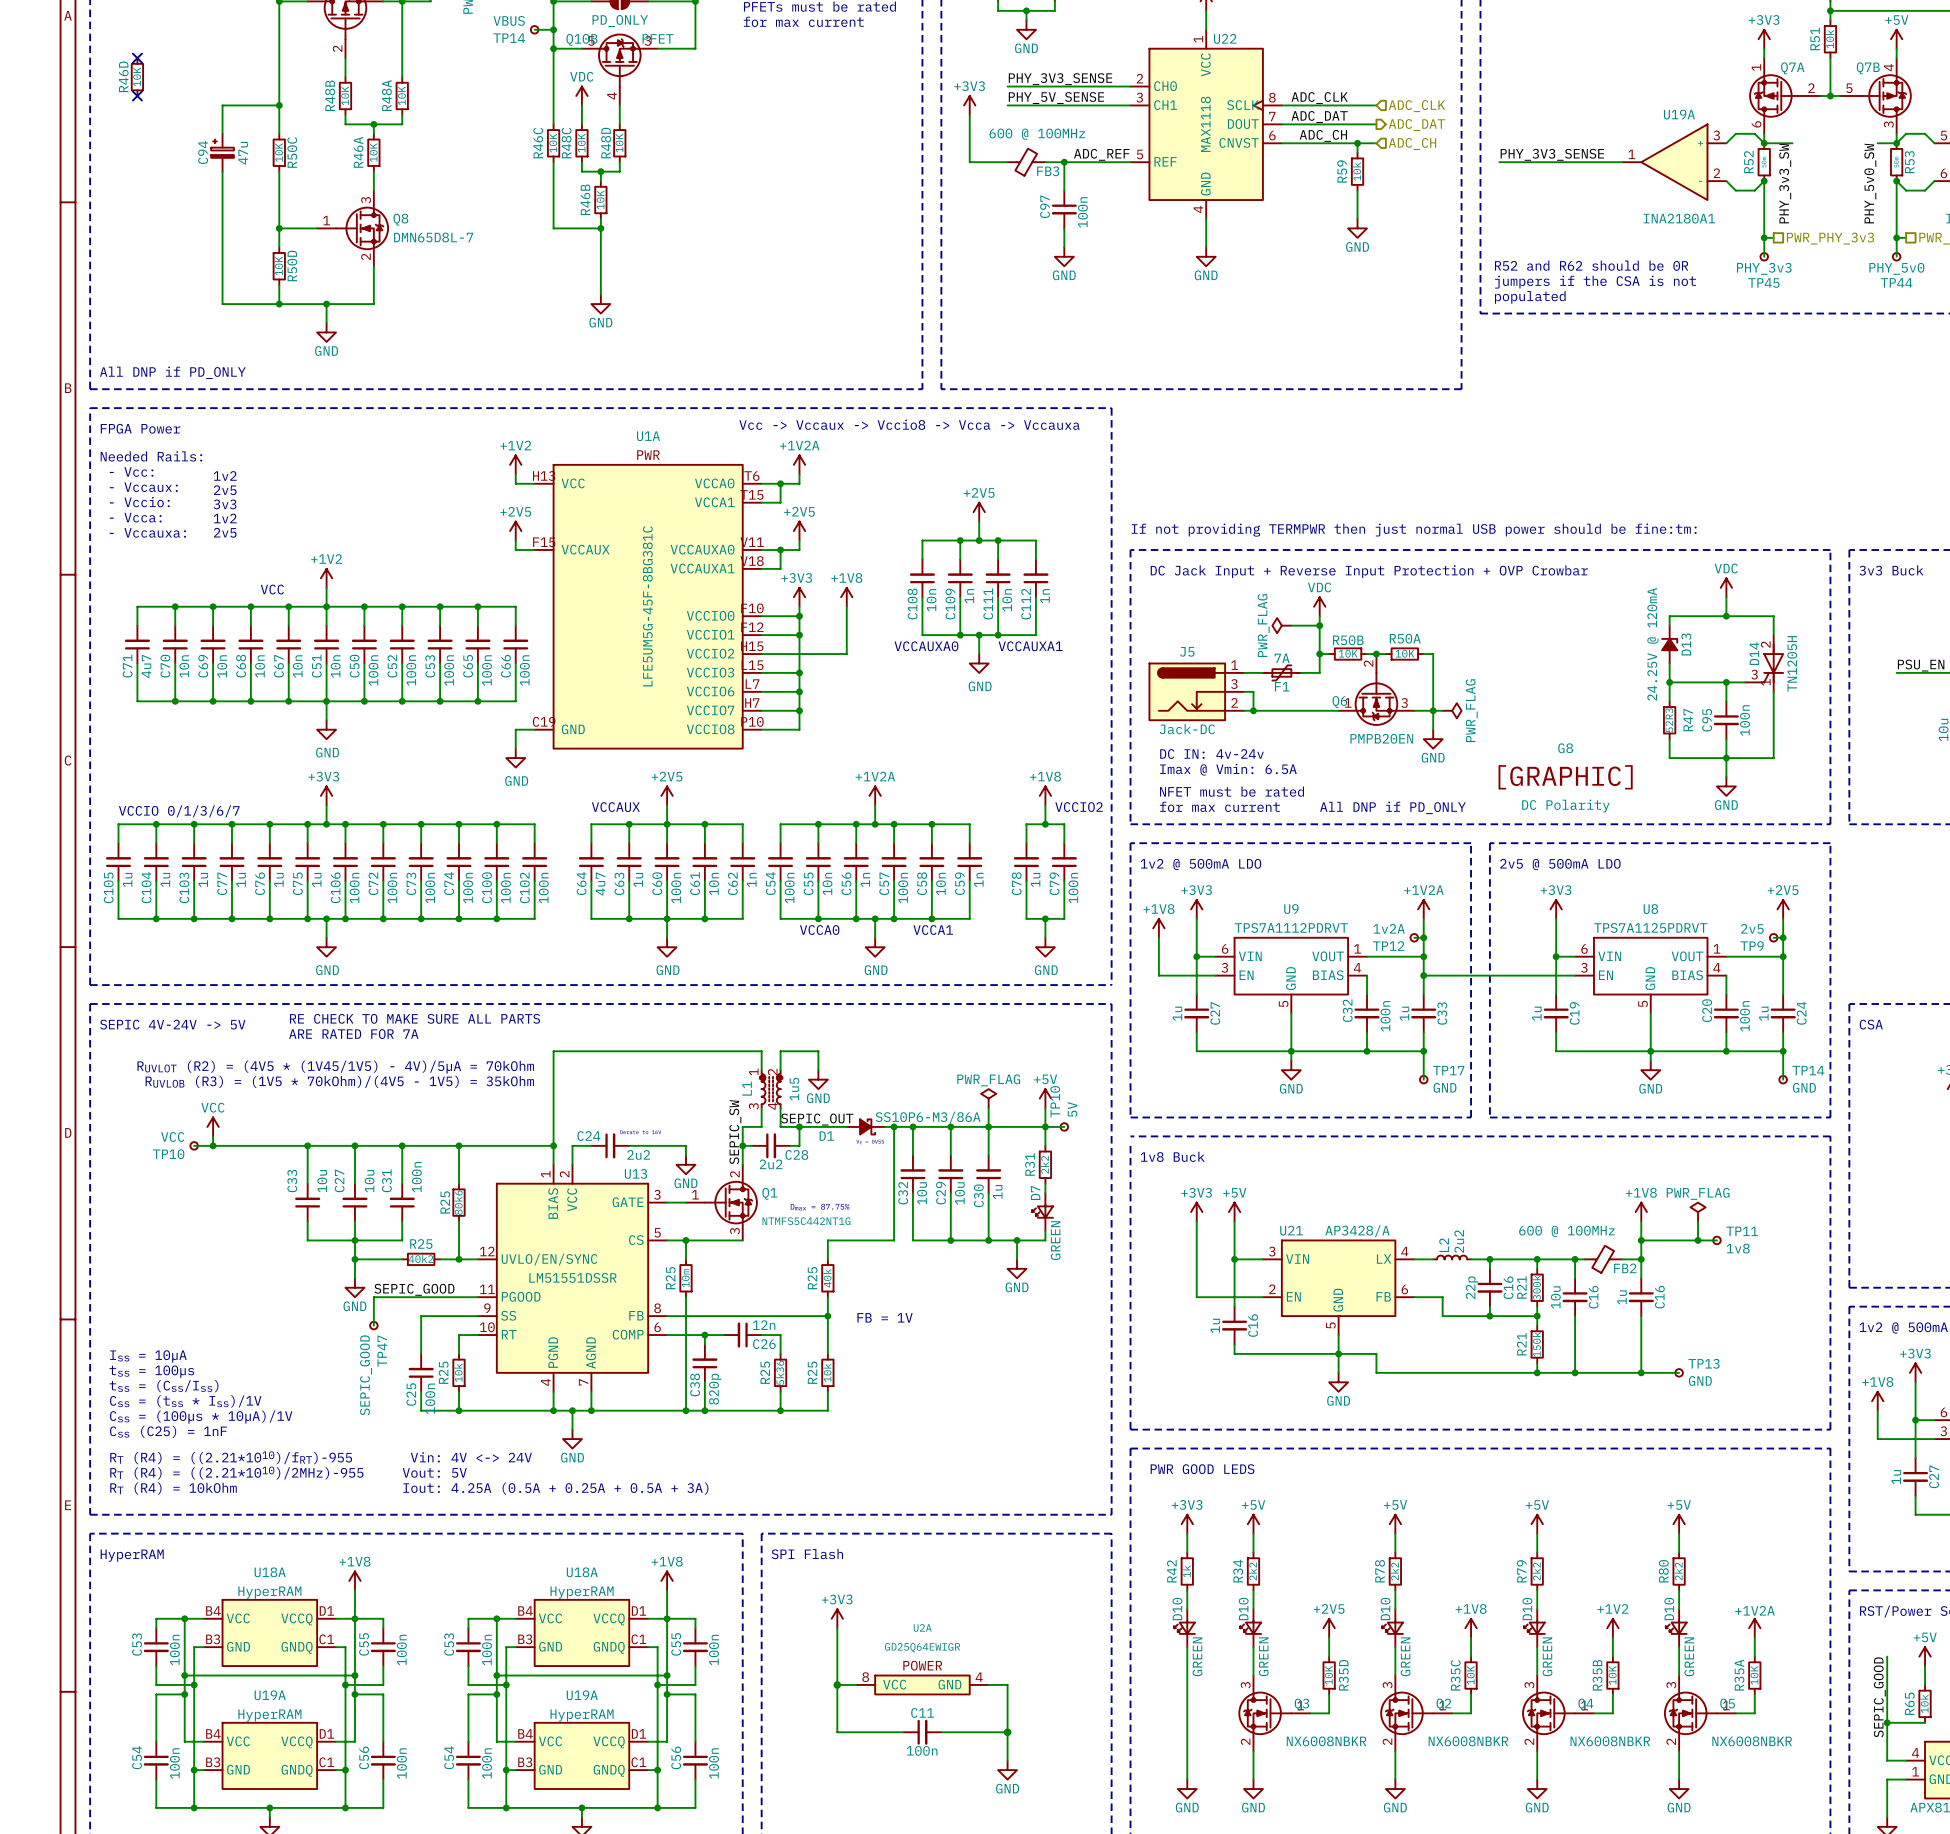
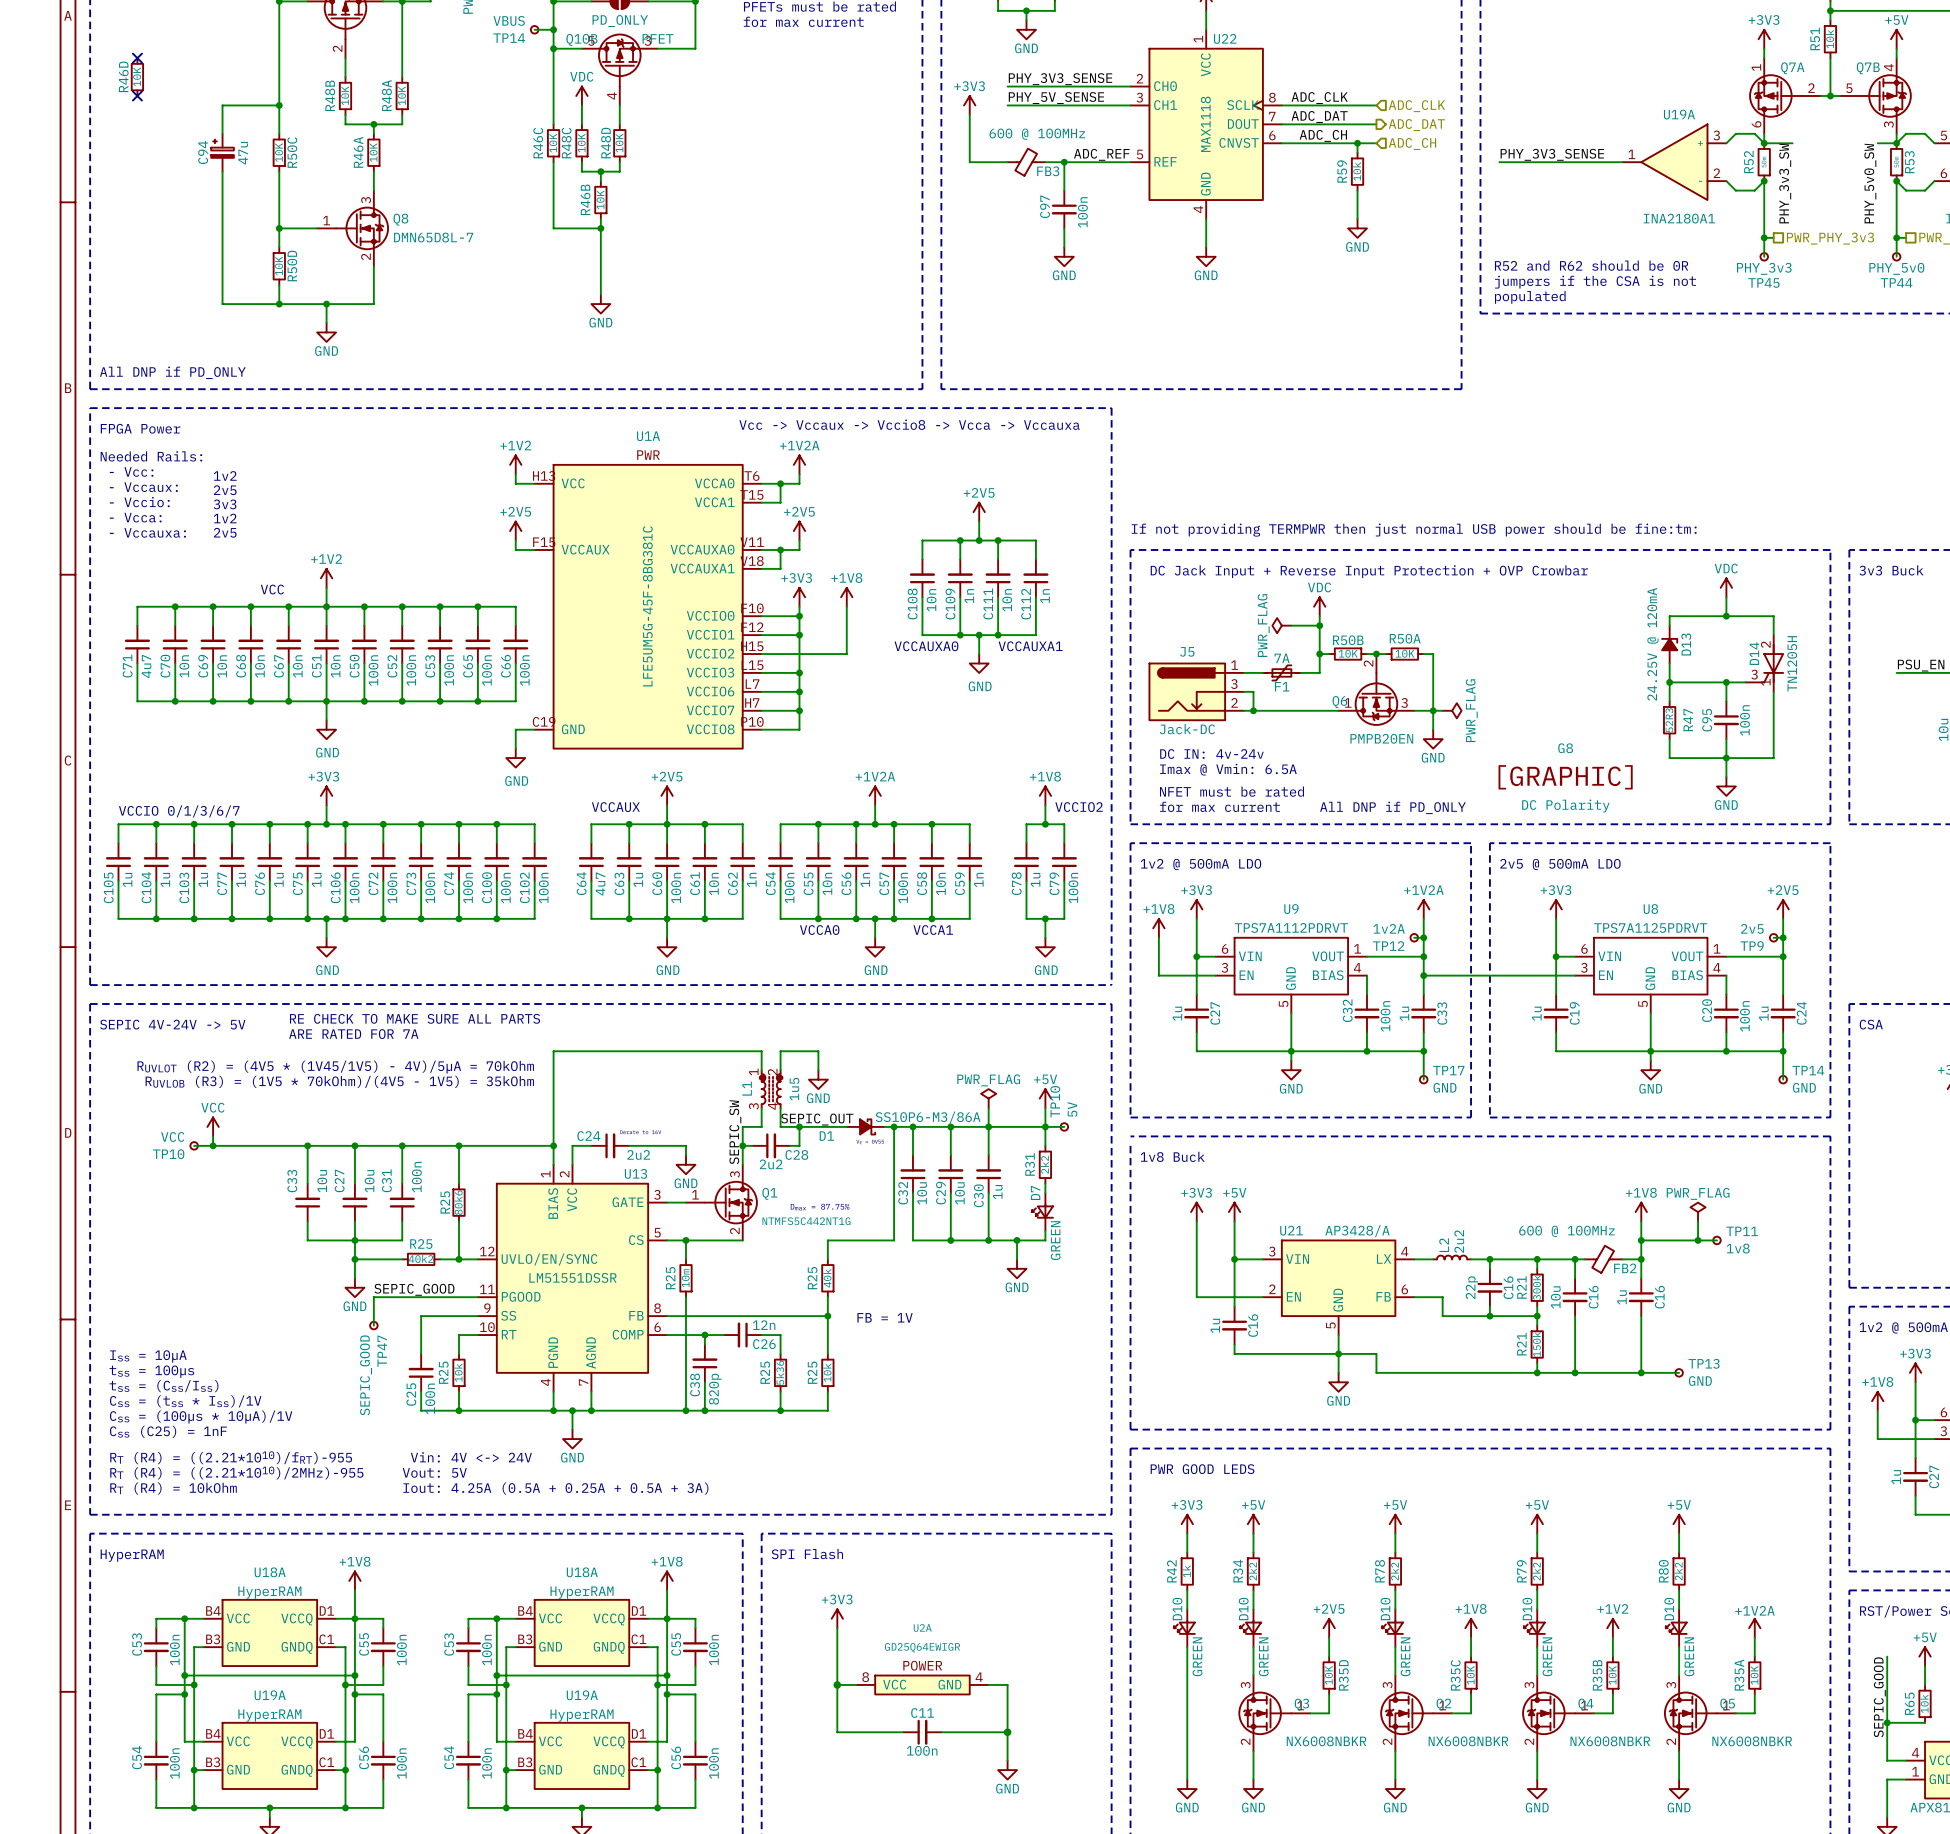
Q1 pin number: 2 (734, 1174) -> 3 (734, 1174)
Q1 pin number: 3 (734, 1231) -> 2 (734, 1230)

